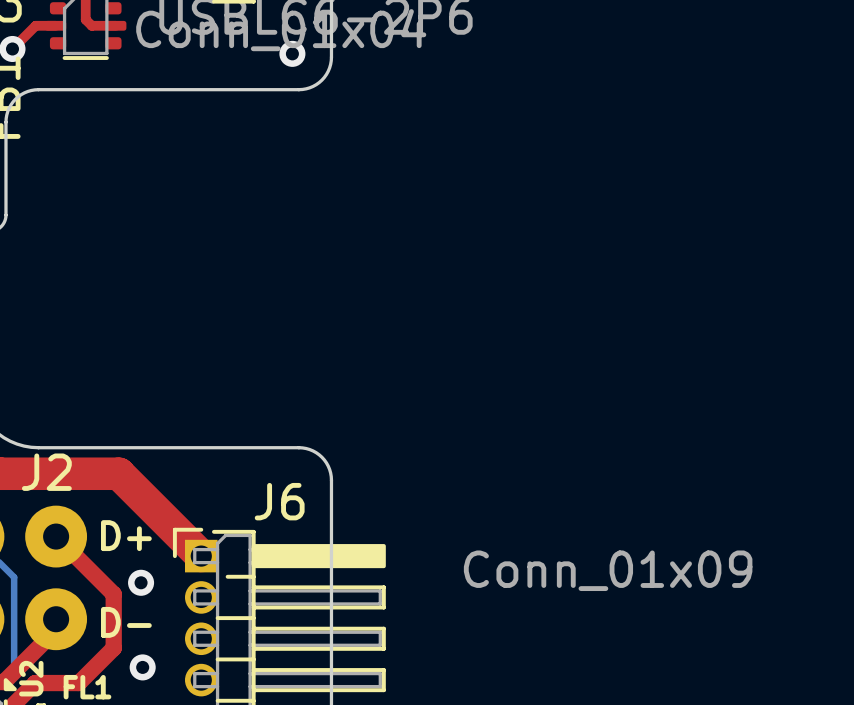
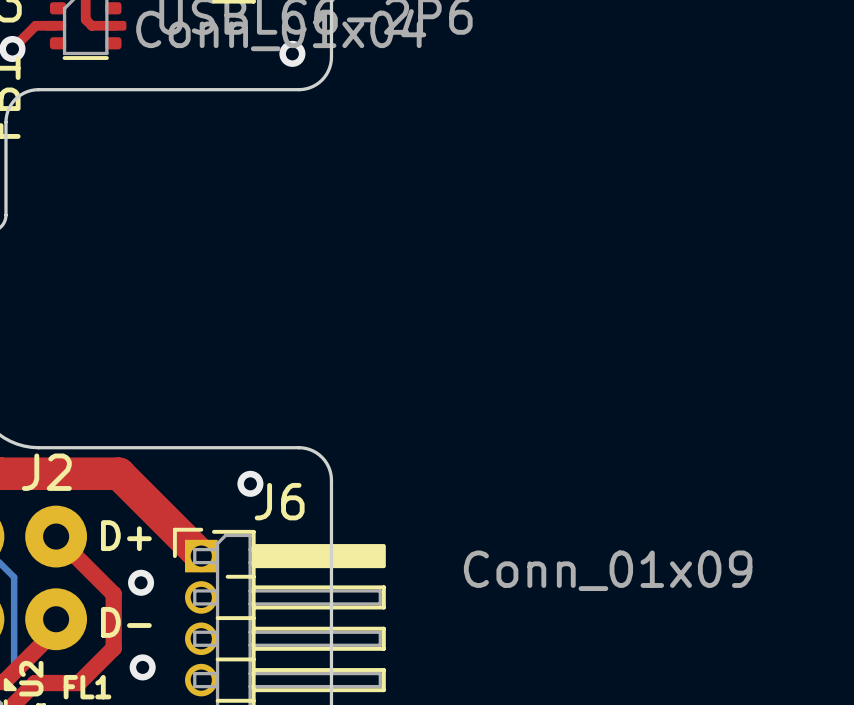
via: none -> (250, 483)

